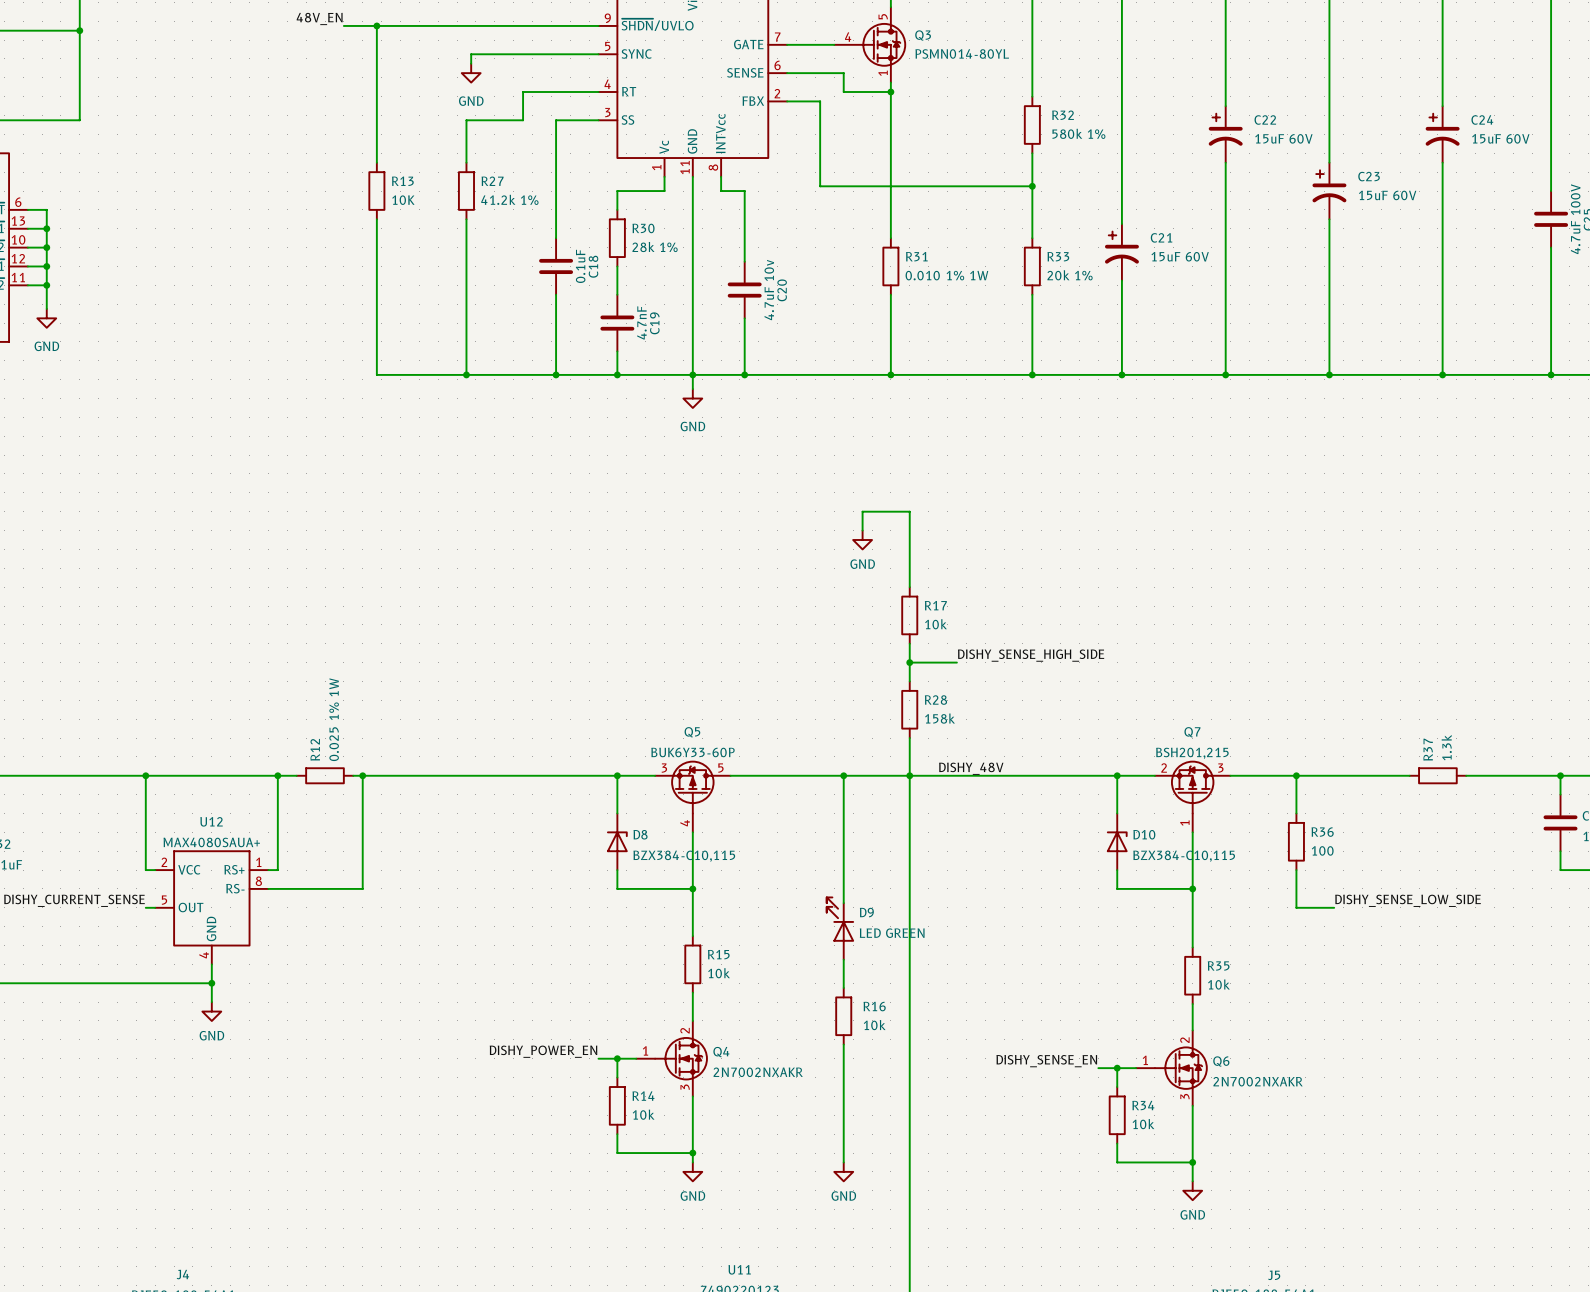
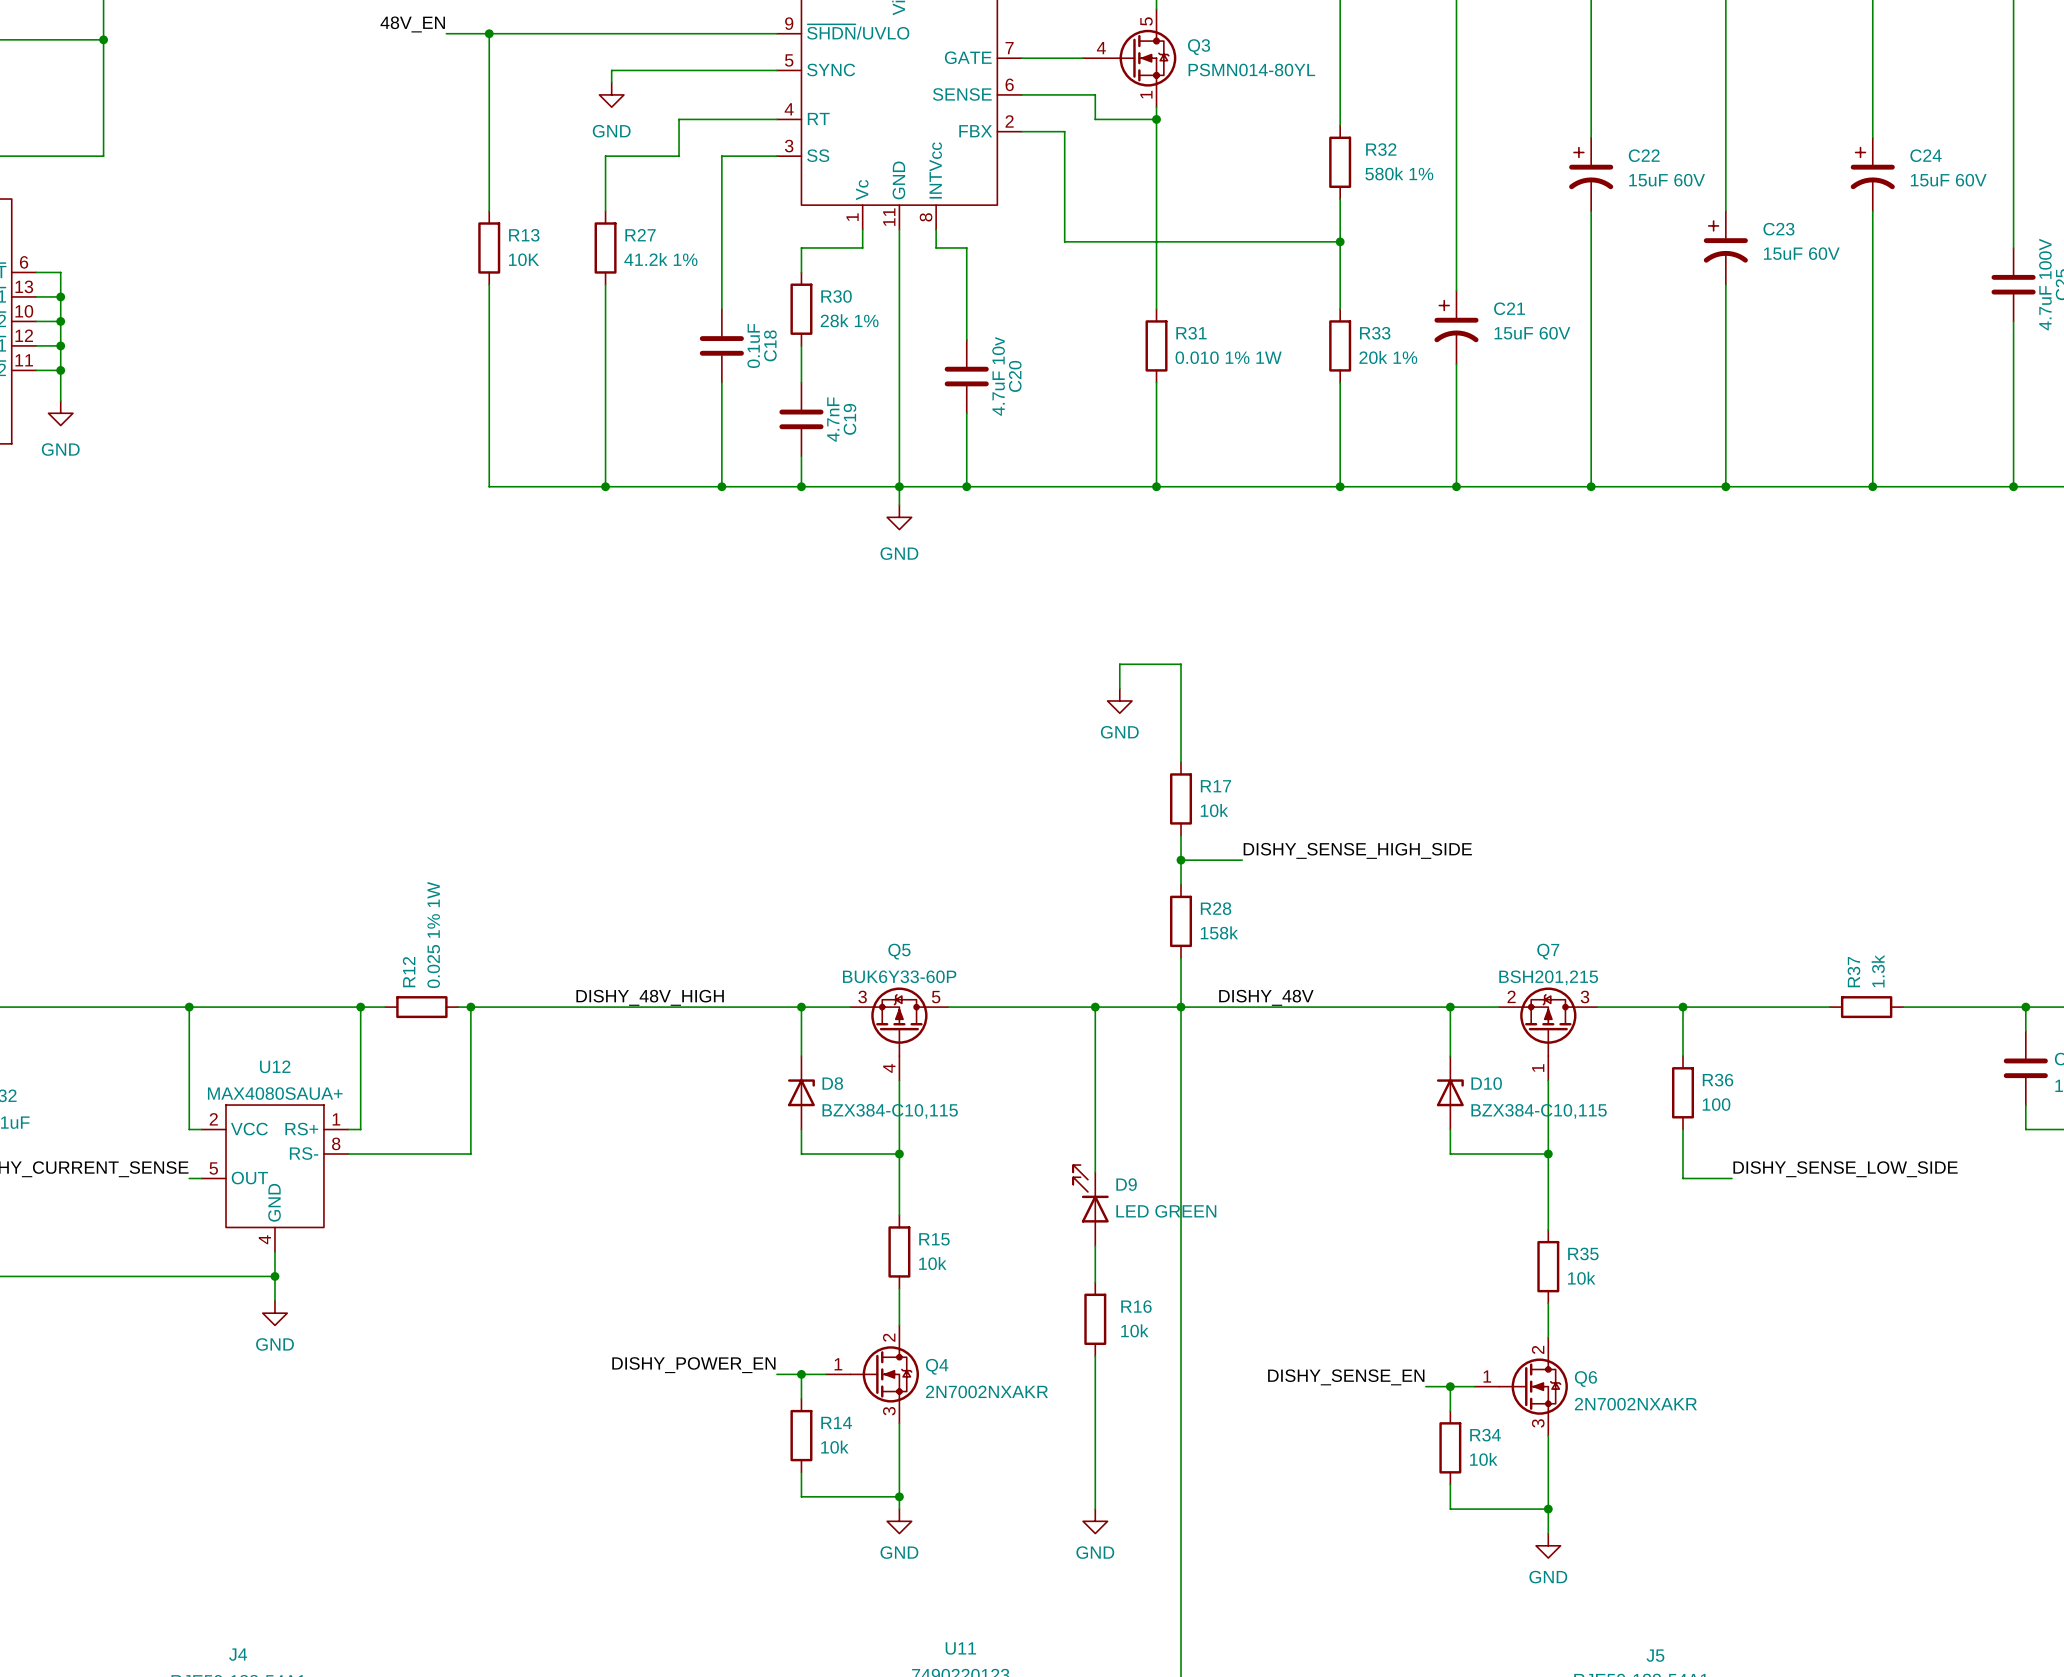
label: none -> DISHY_48V_HIGH (650, 997)

